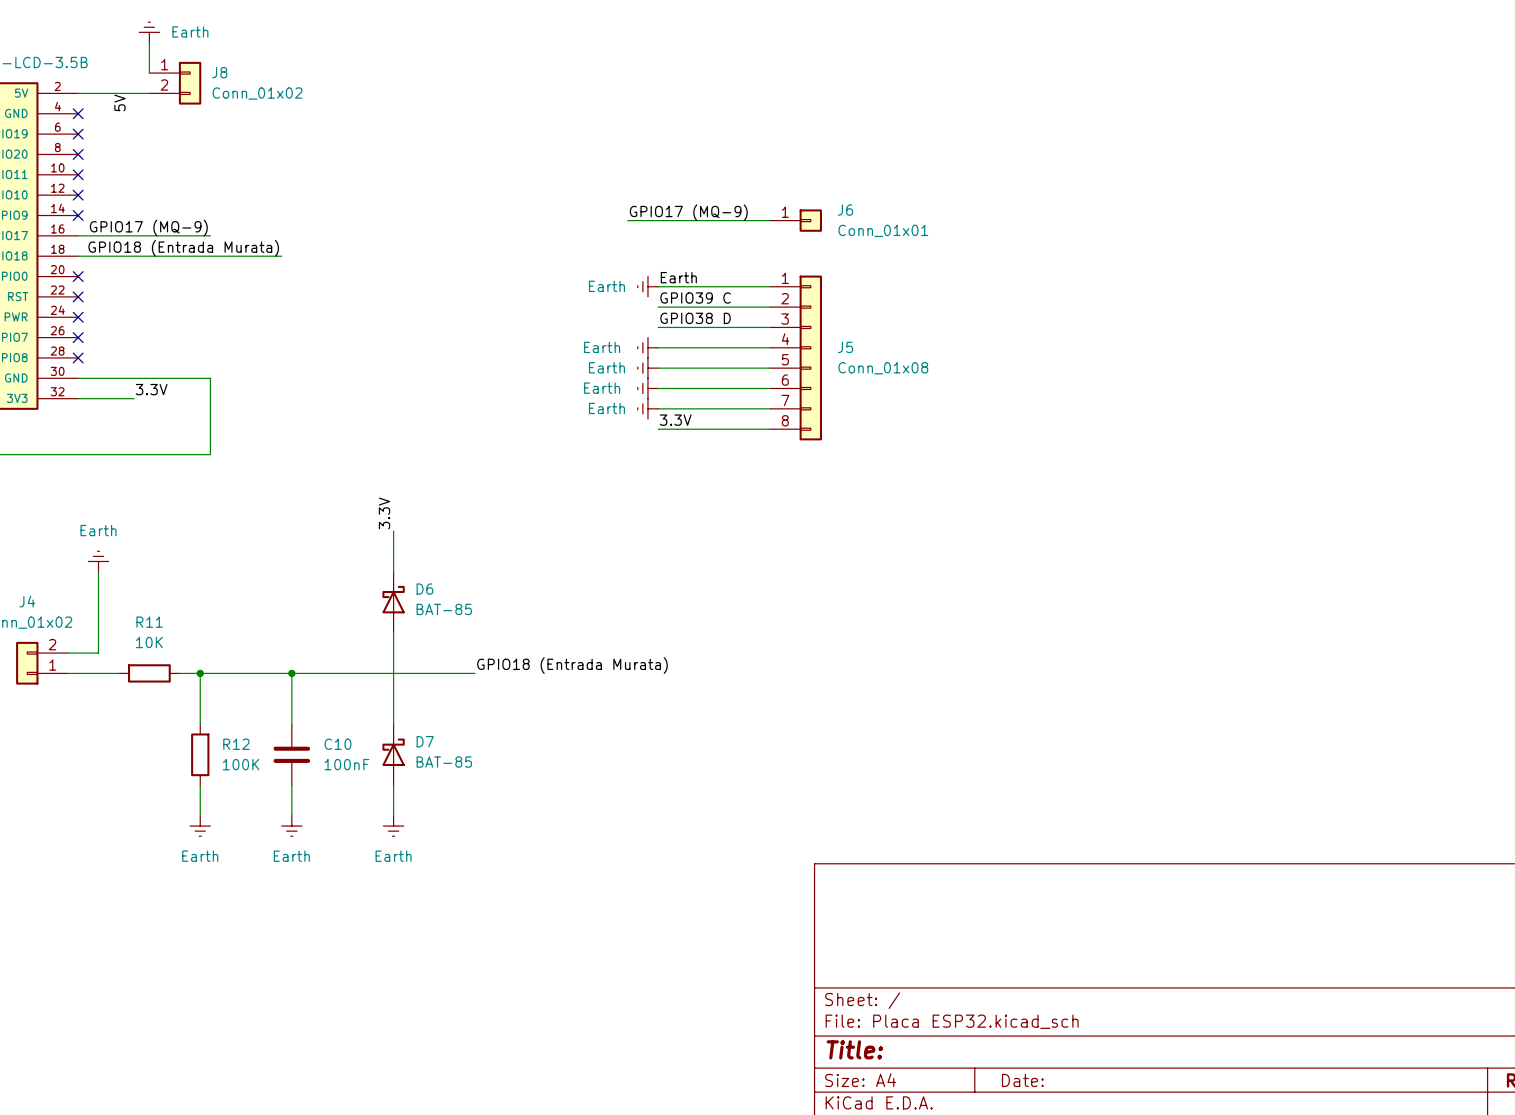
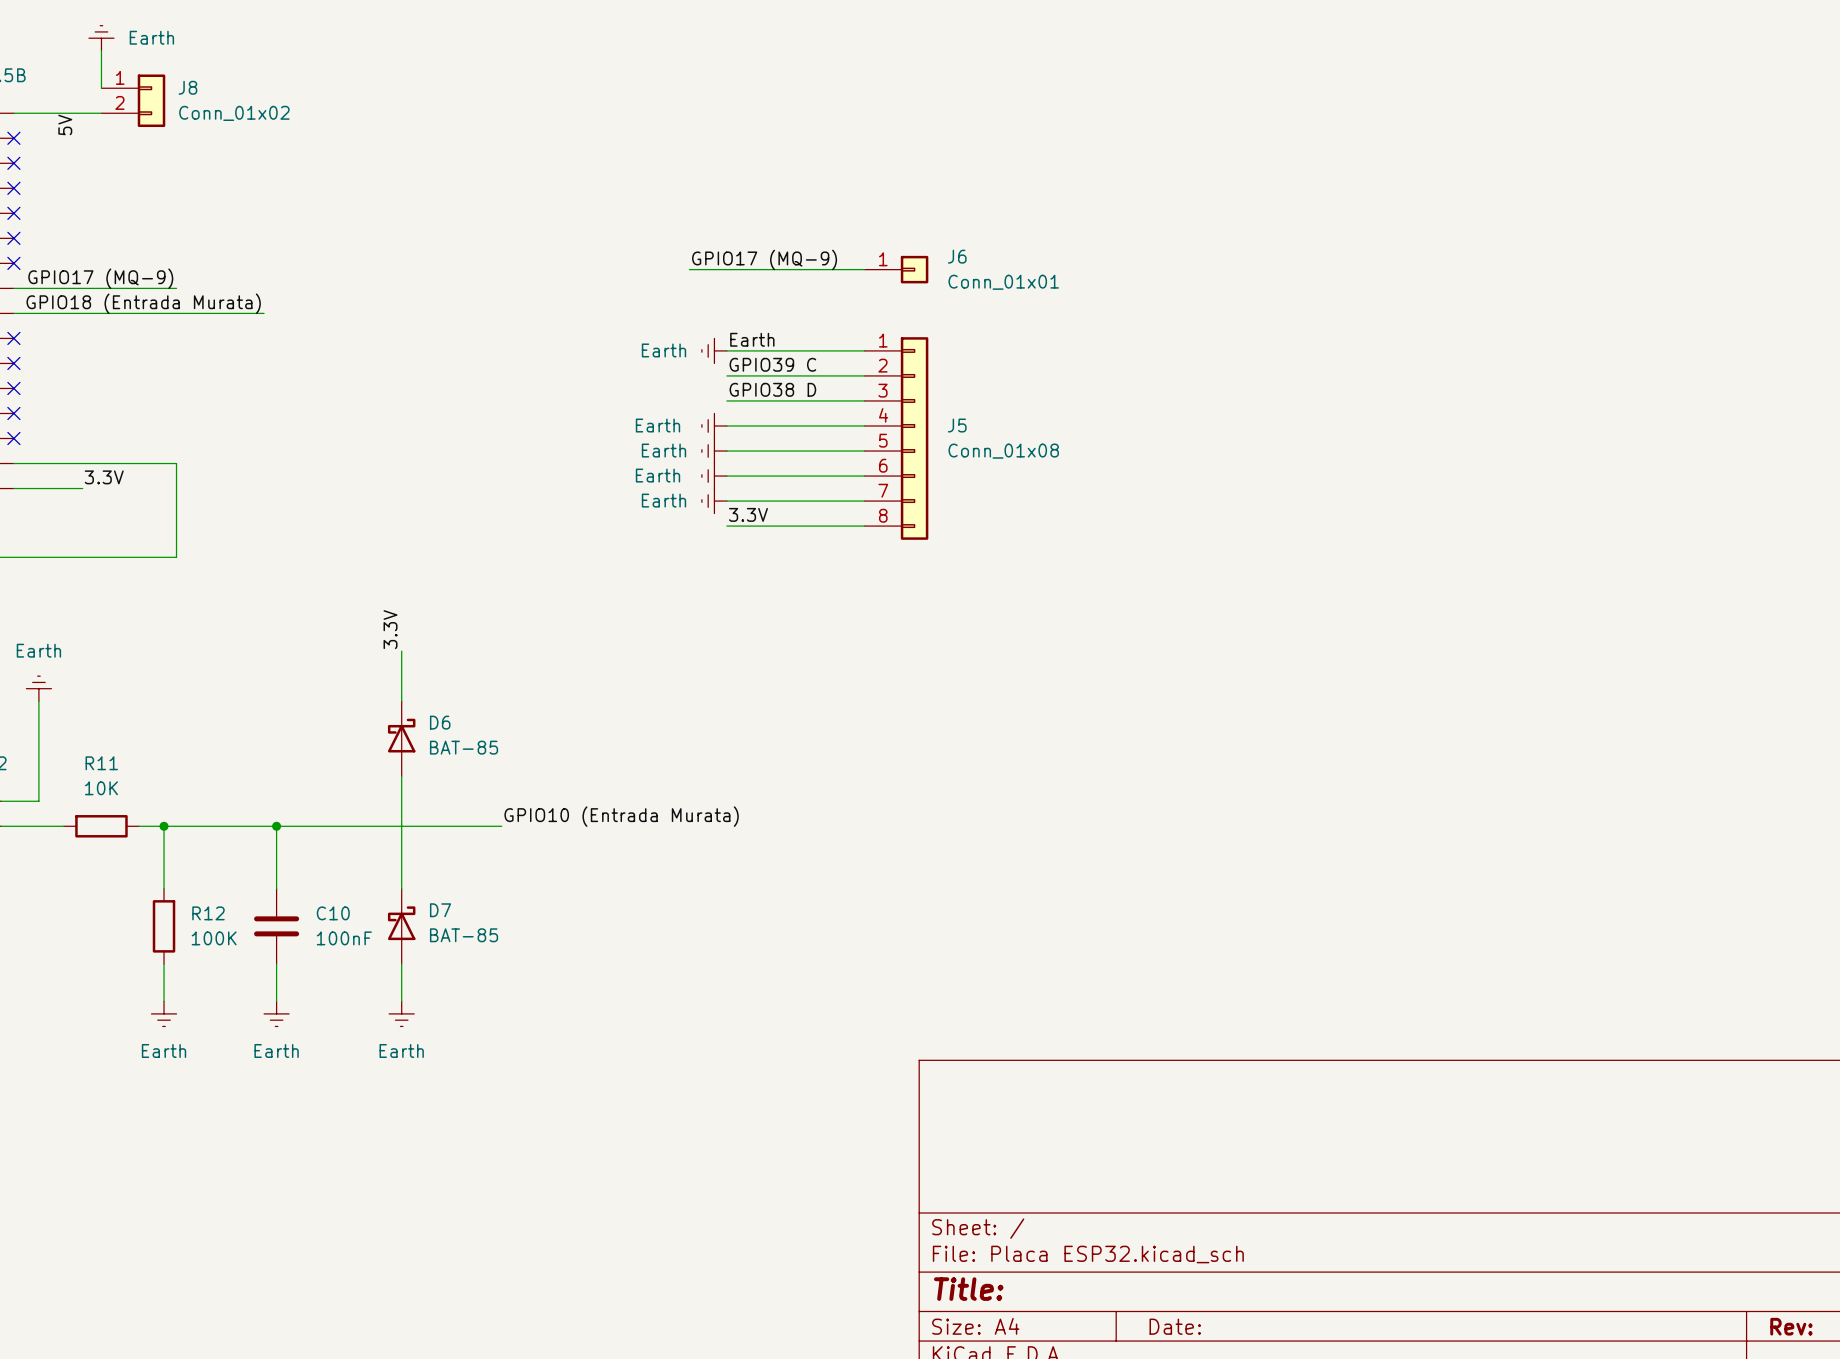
label: GPIO18 (Entrada Murata) (572, 665) -> GPIO10 (Entrada Murata) (621, 816)

